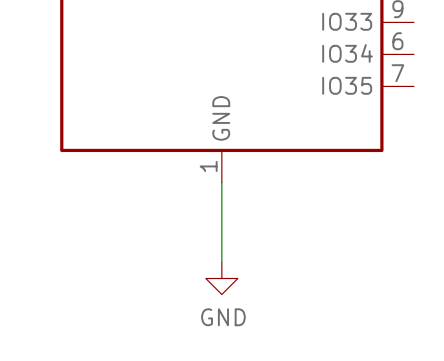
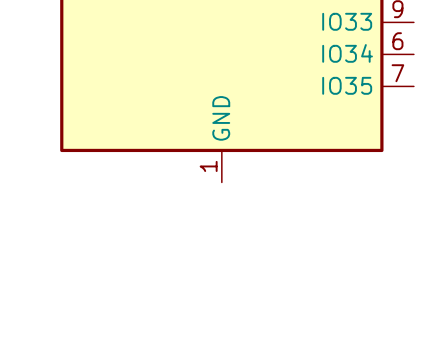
wire: (221, 182) (221, 262) -> none
power symbol: GND (221, 278) -> none

